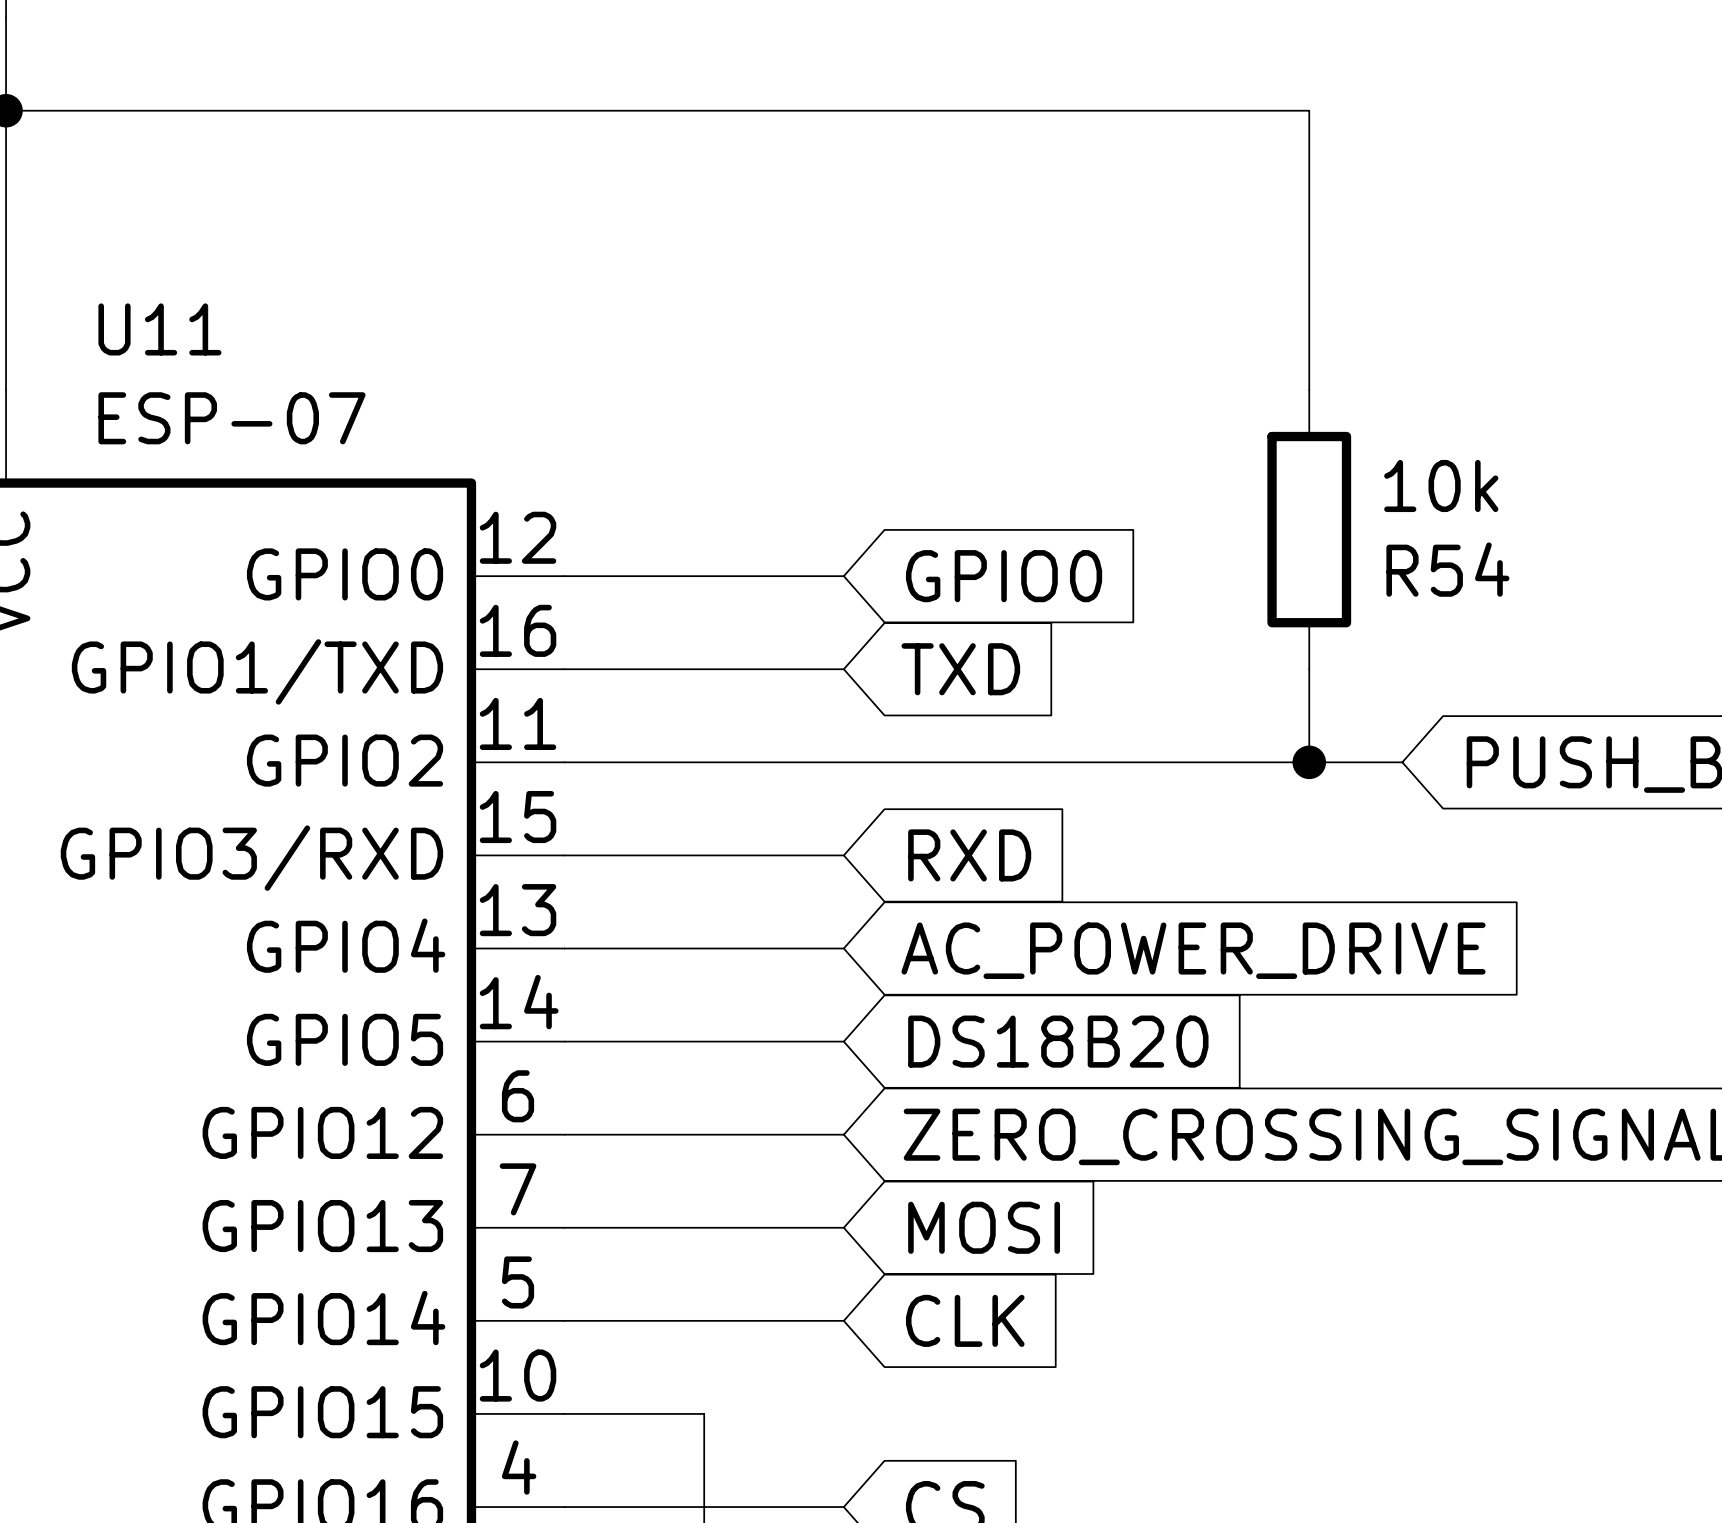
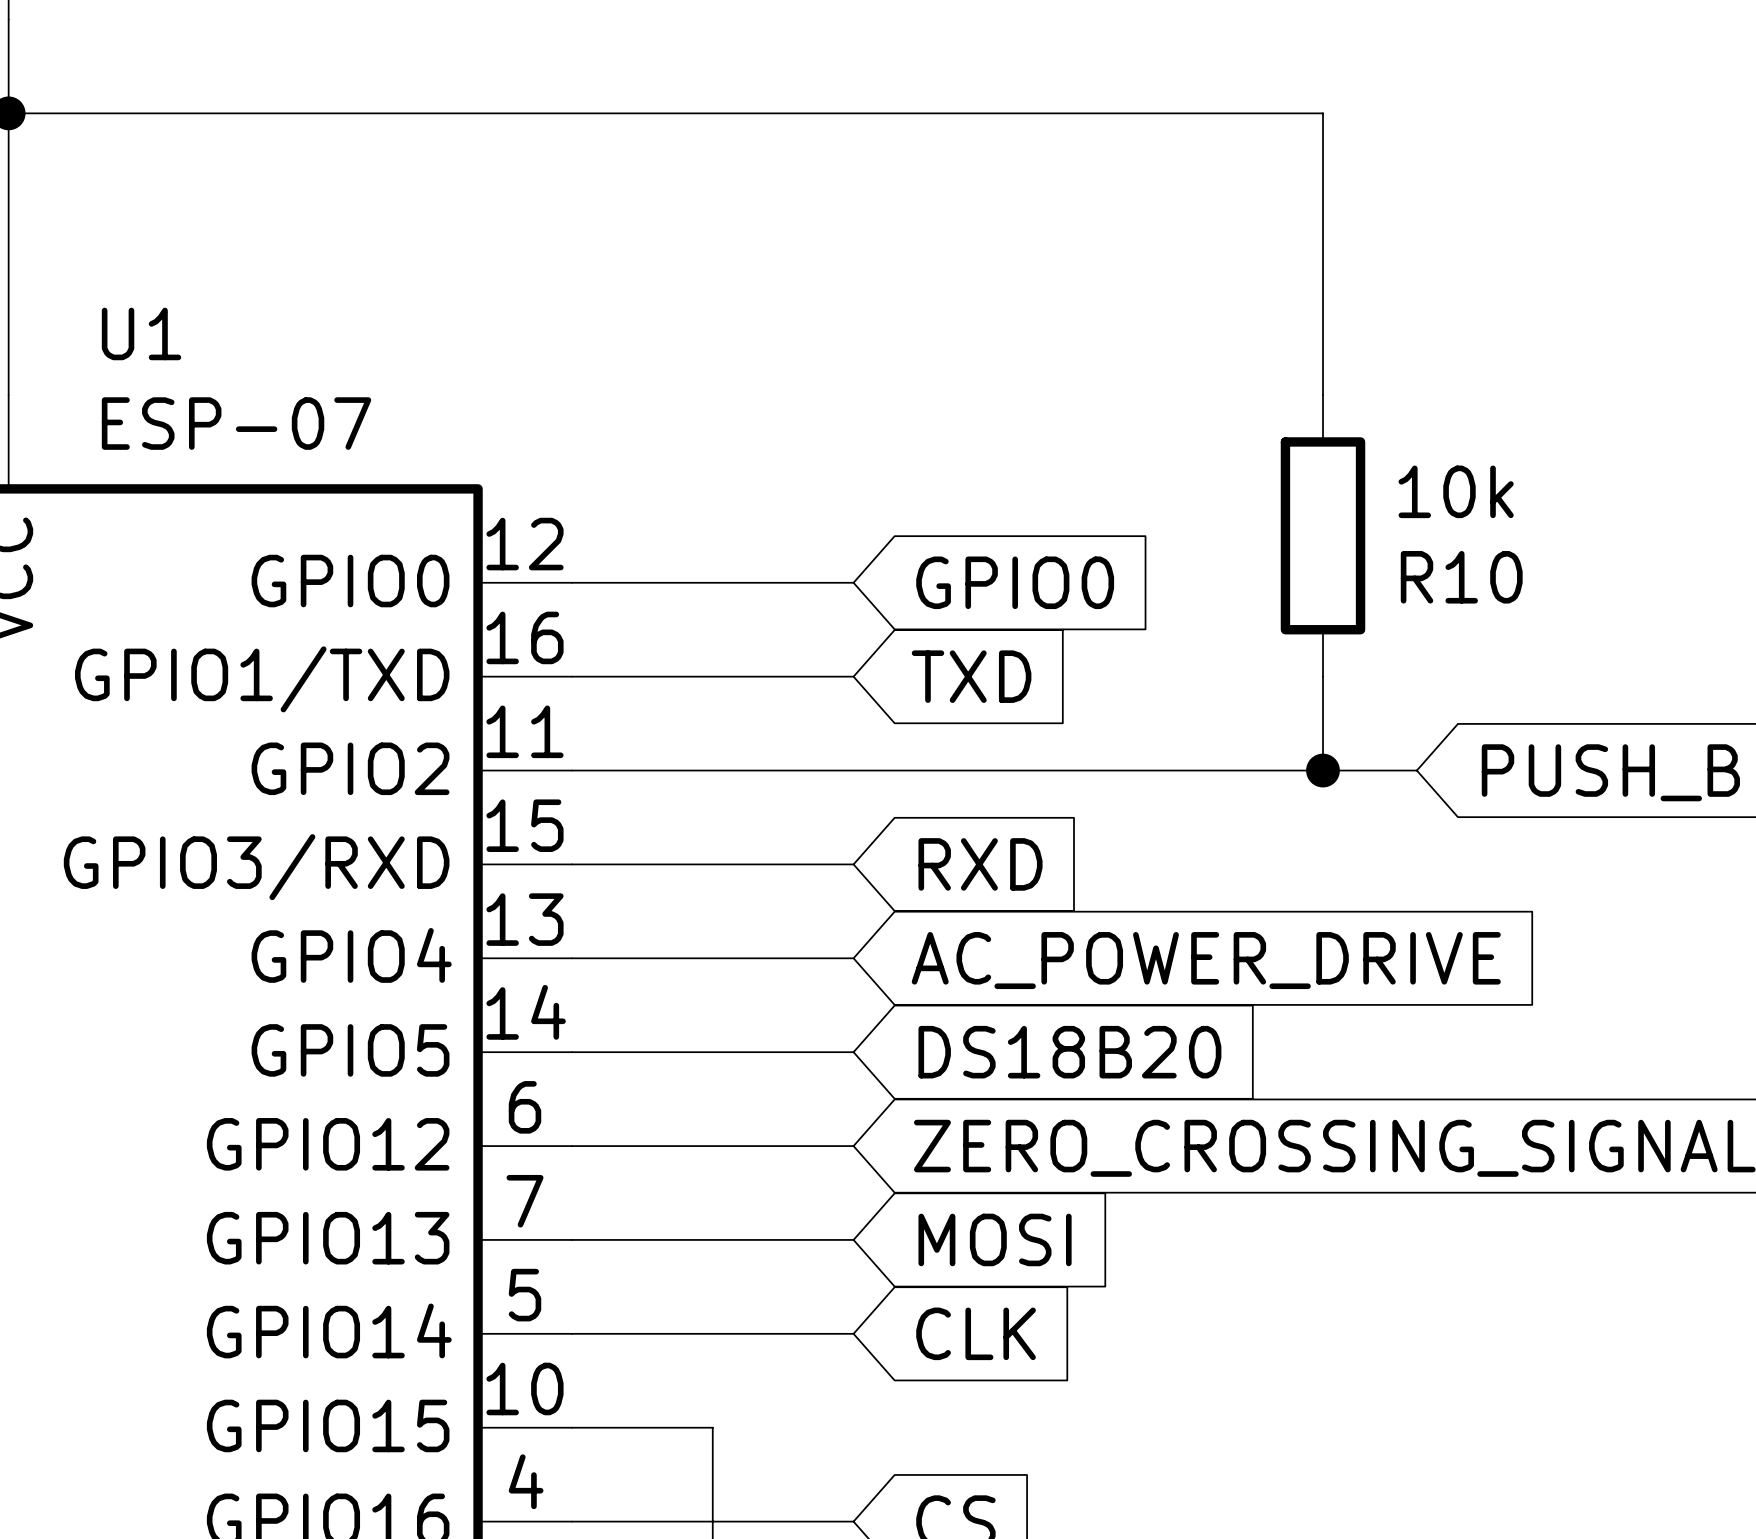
U11 name: U11 (159, 329) -> U1 (141, 333)
R54 name: R54 (1447, 569) -> R10 (1461, 577)

